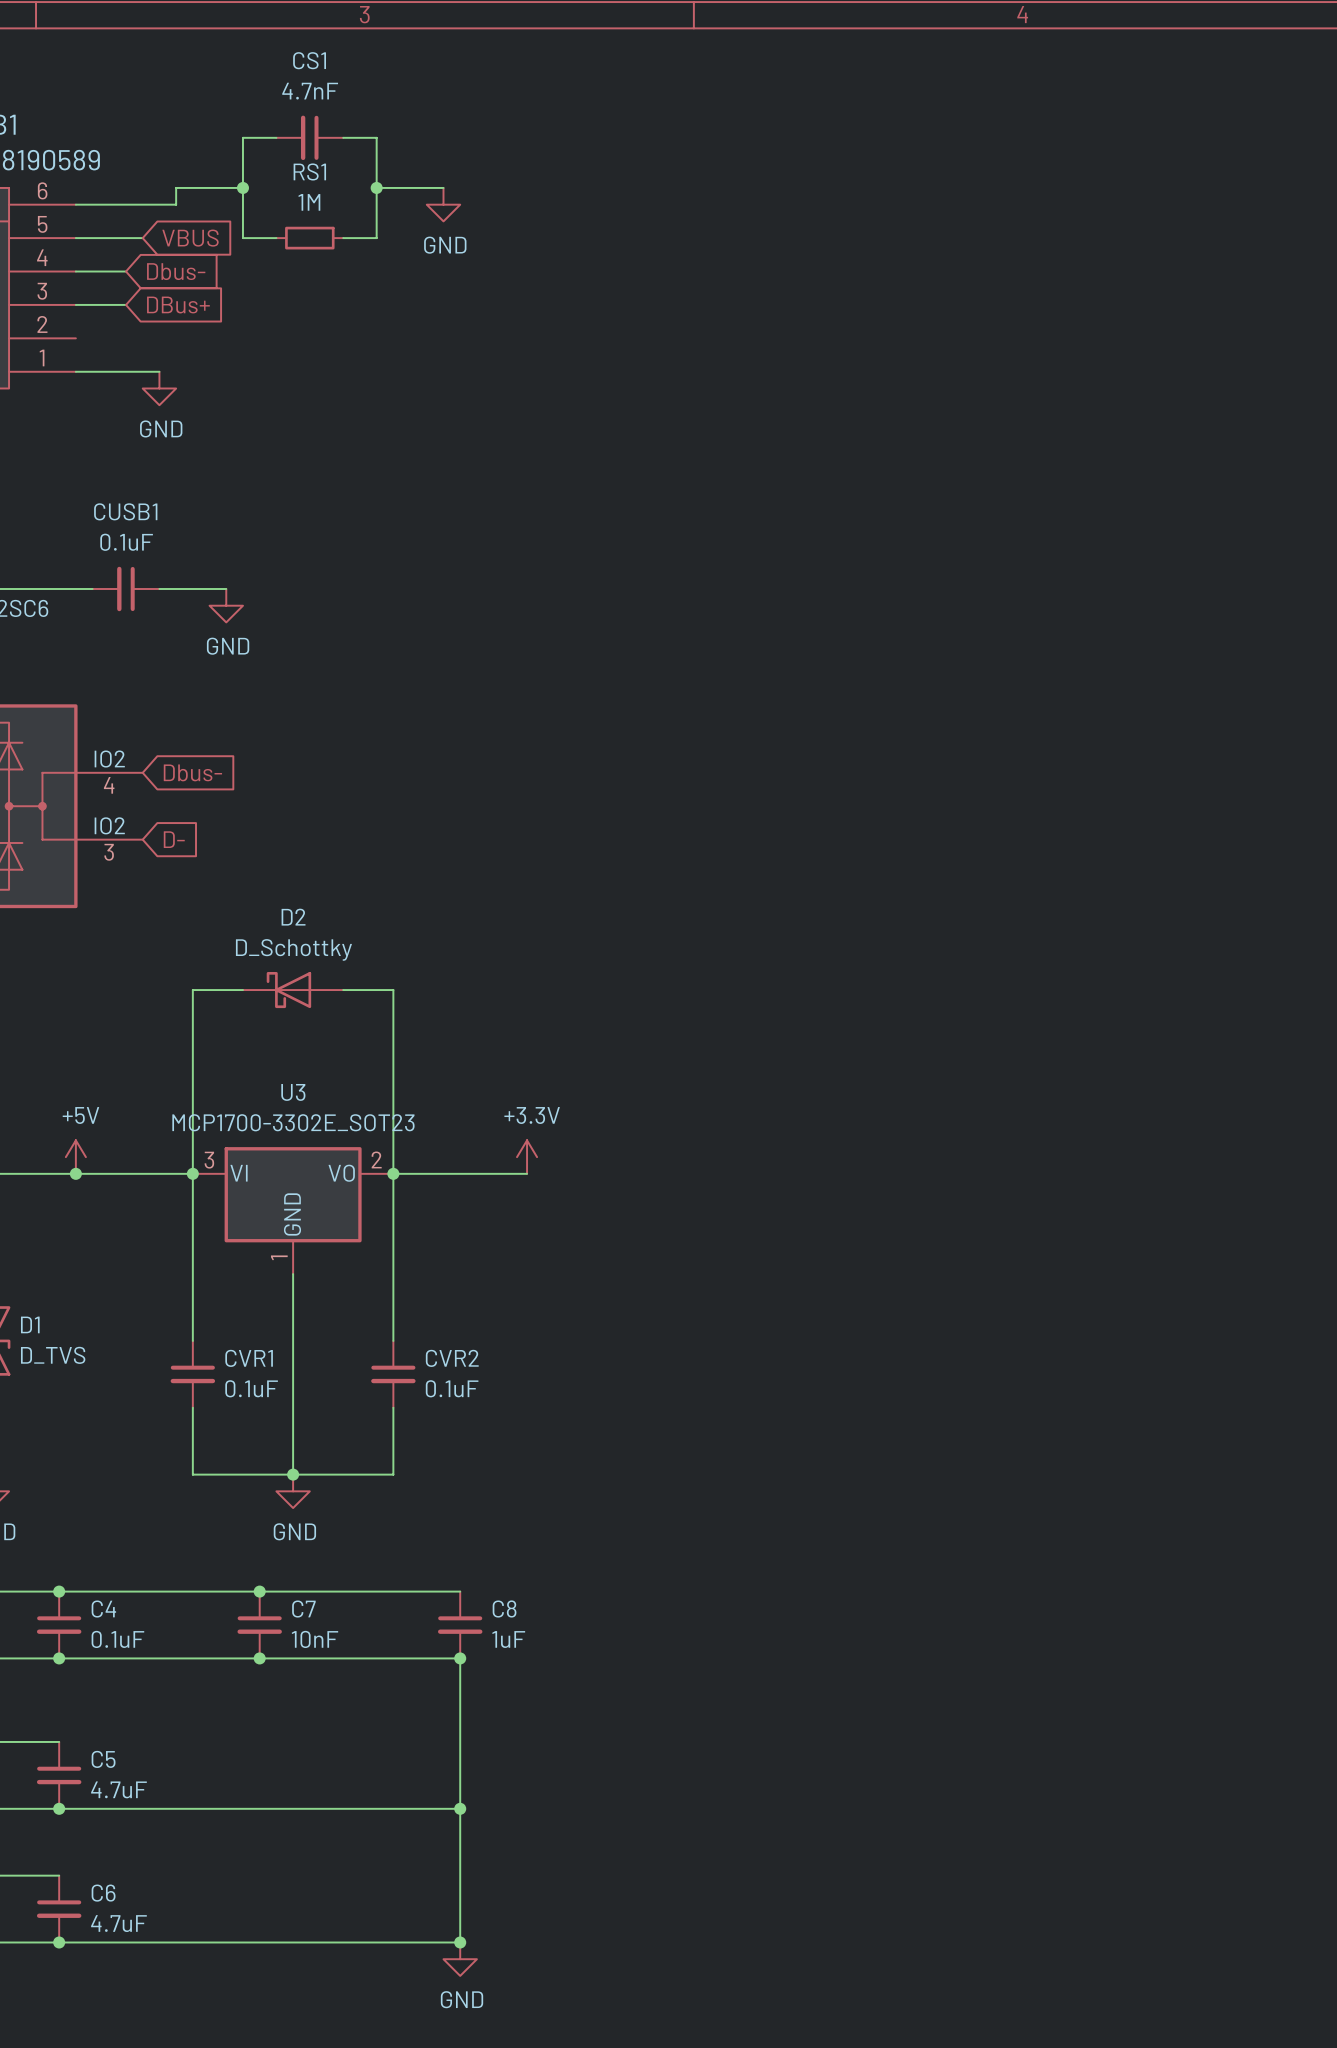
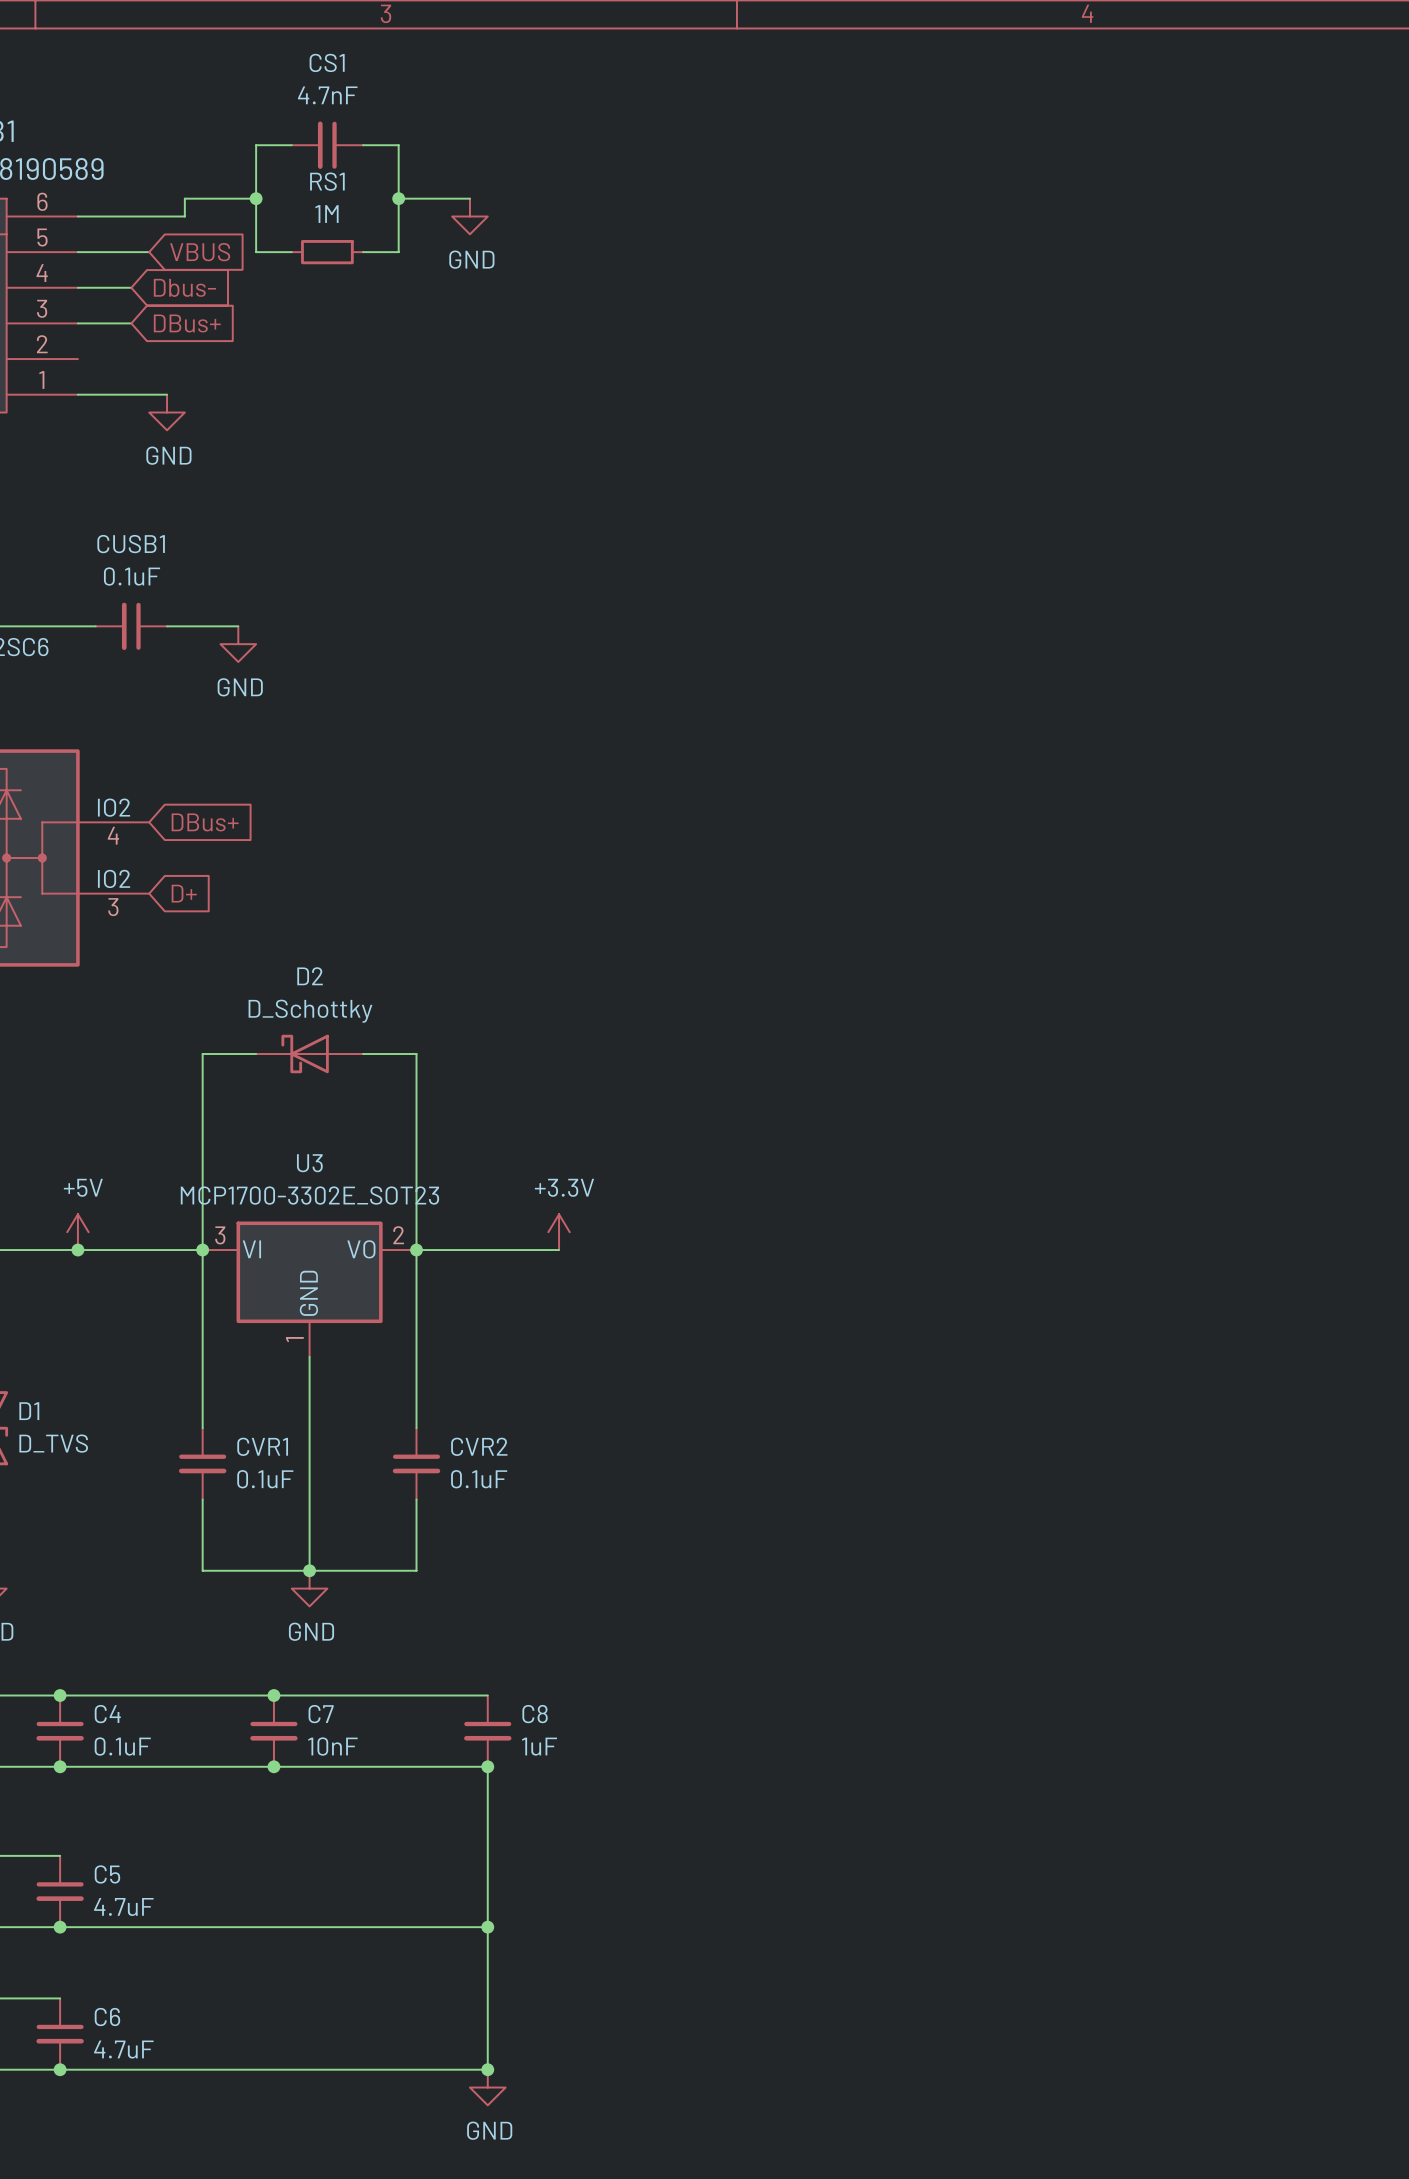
global label: Dbus- (192, 772) -> DBus+ (205, 822)
global label: D- (174, 839) -> D+ (184, 893)

